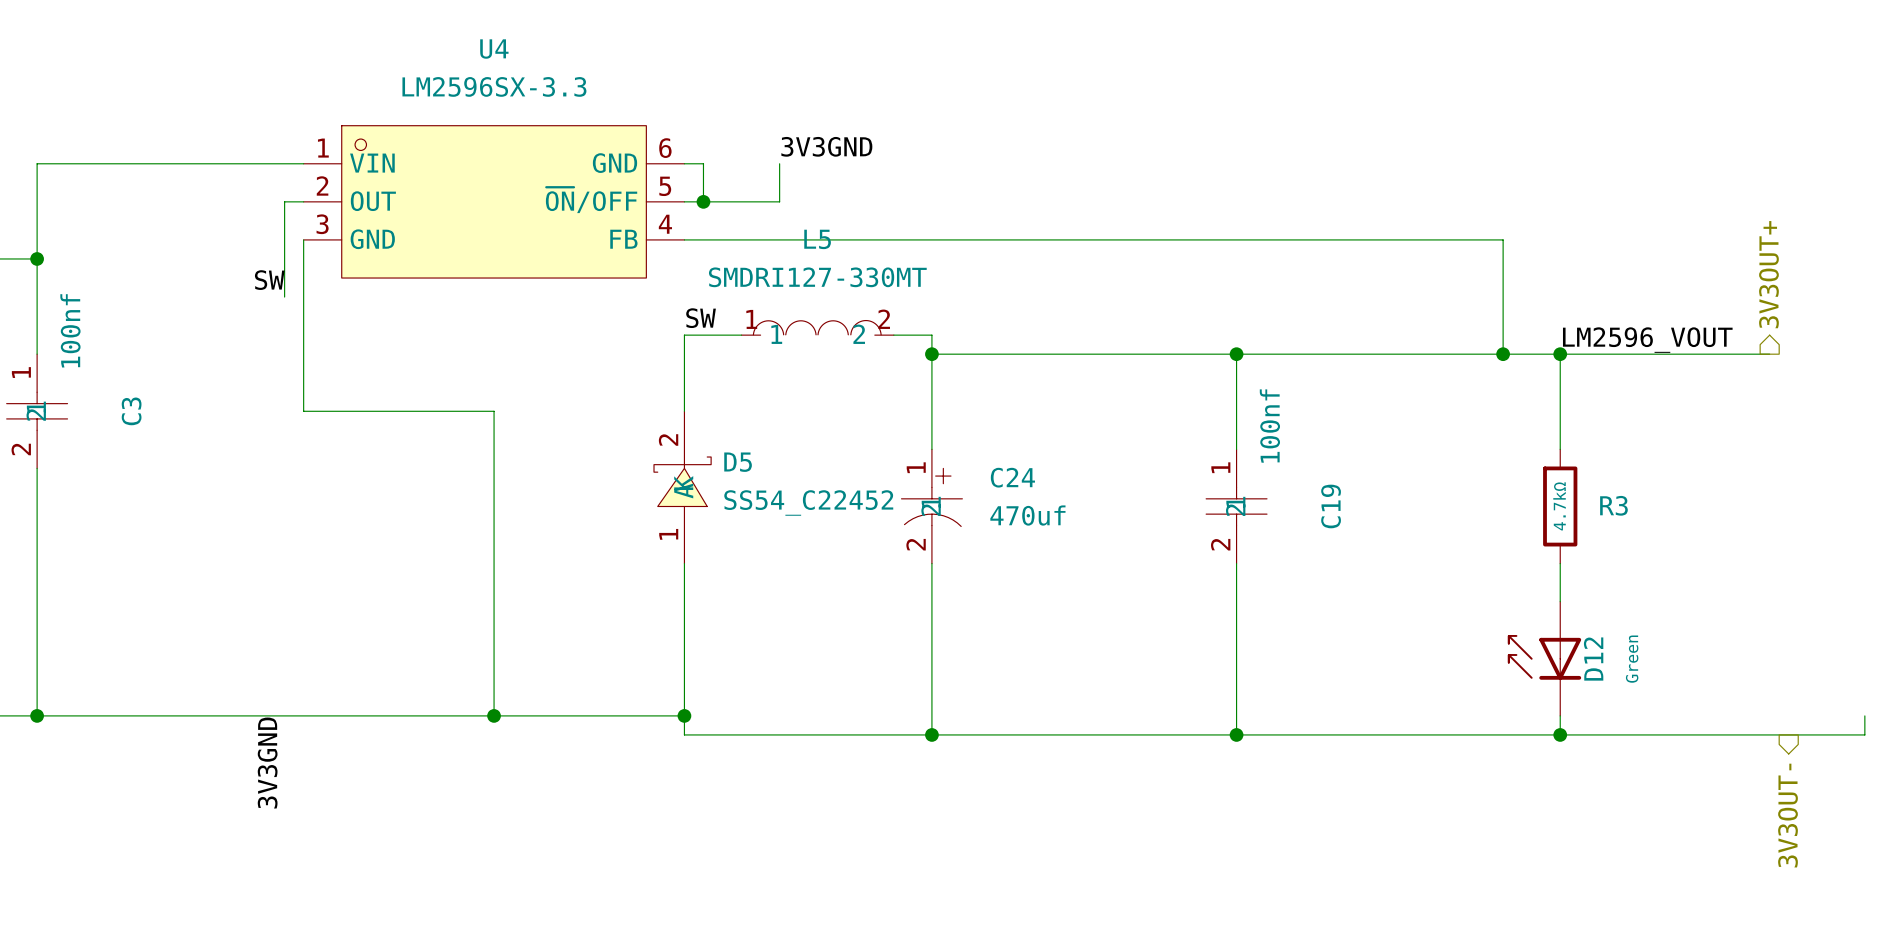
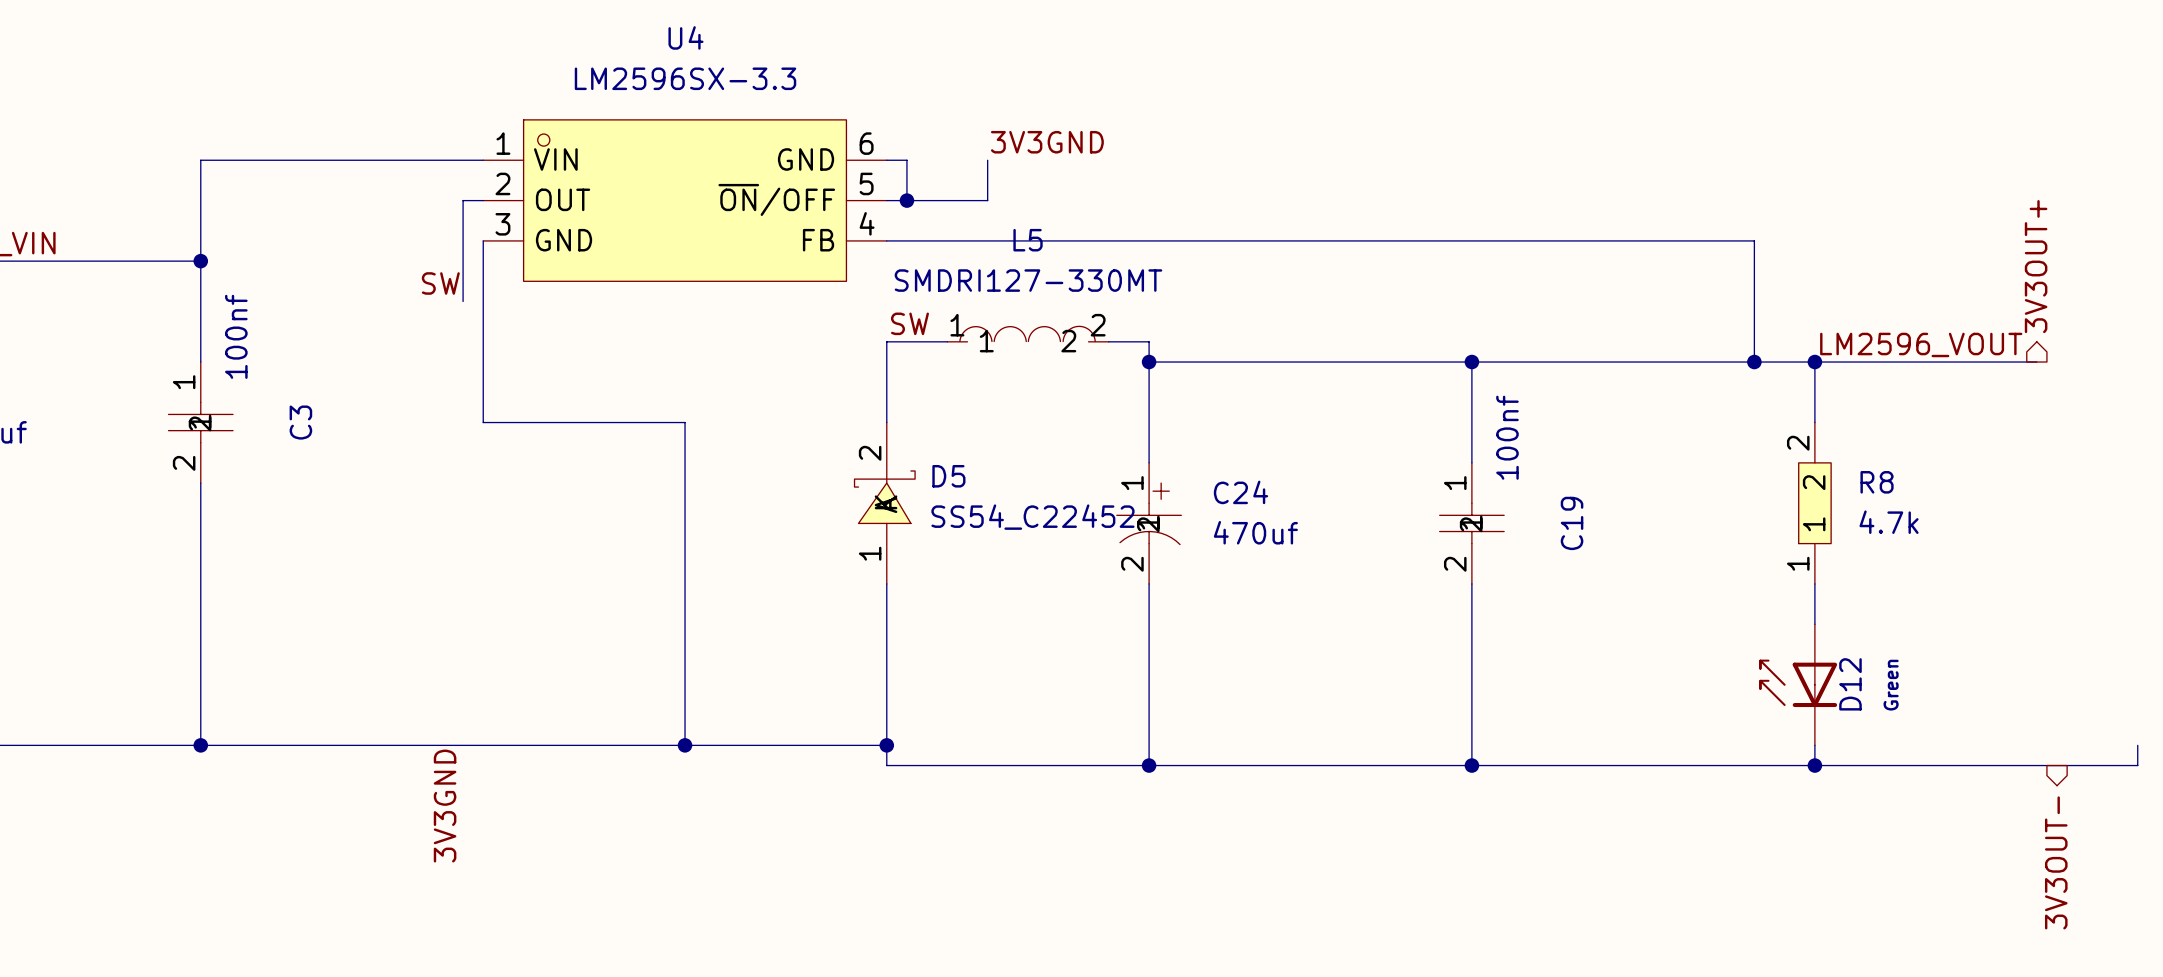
R8: none -> 4.7k (1814, 503)
R3: 4.7kΩ (1560, 506) -> none

